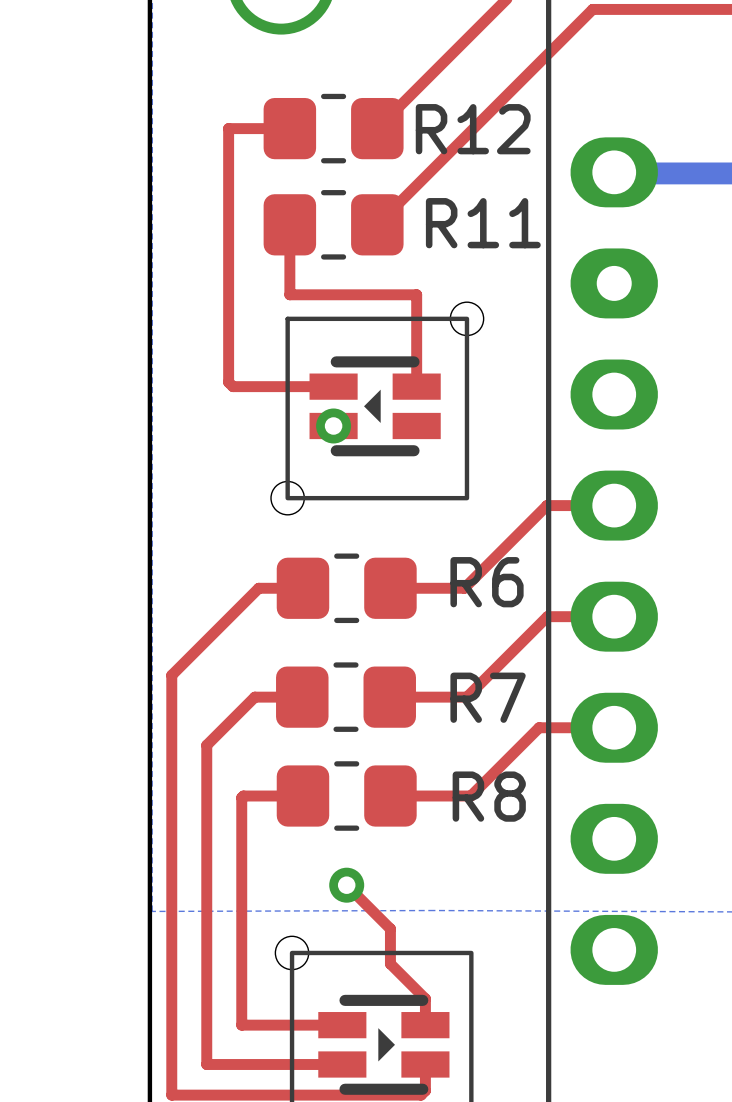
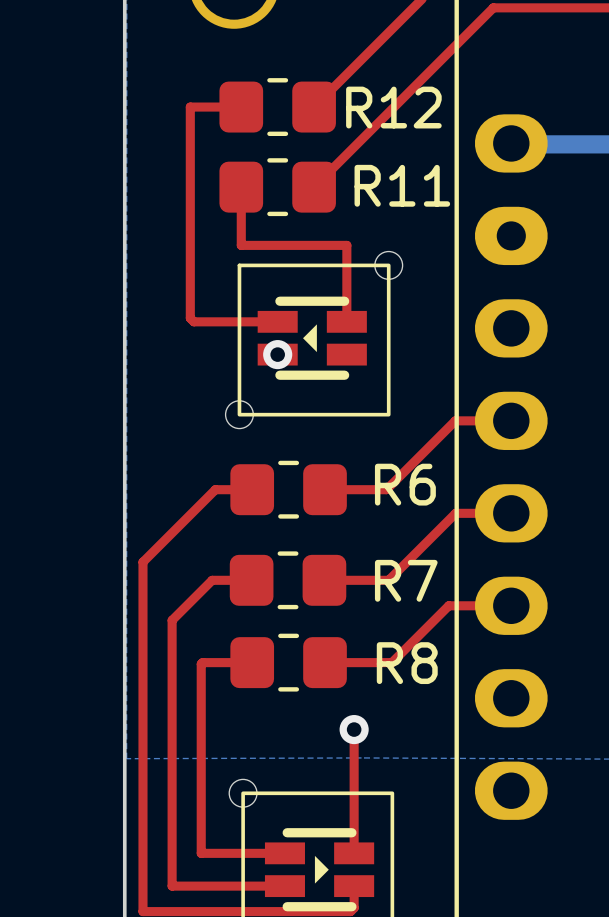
top track: (346, 885) (390, 928) (390, 963) (425, 998) -> (354, 729) (354, 831)
via position: (346, 885) -> (354, 729)

